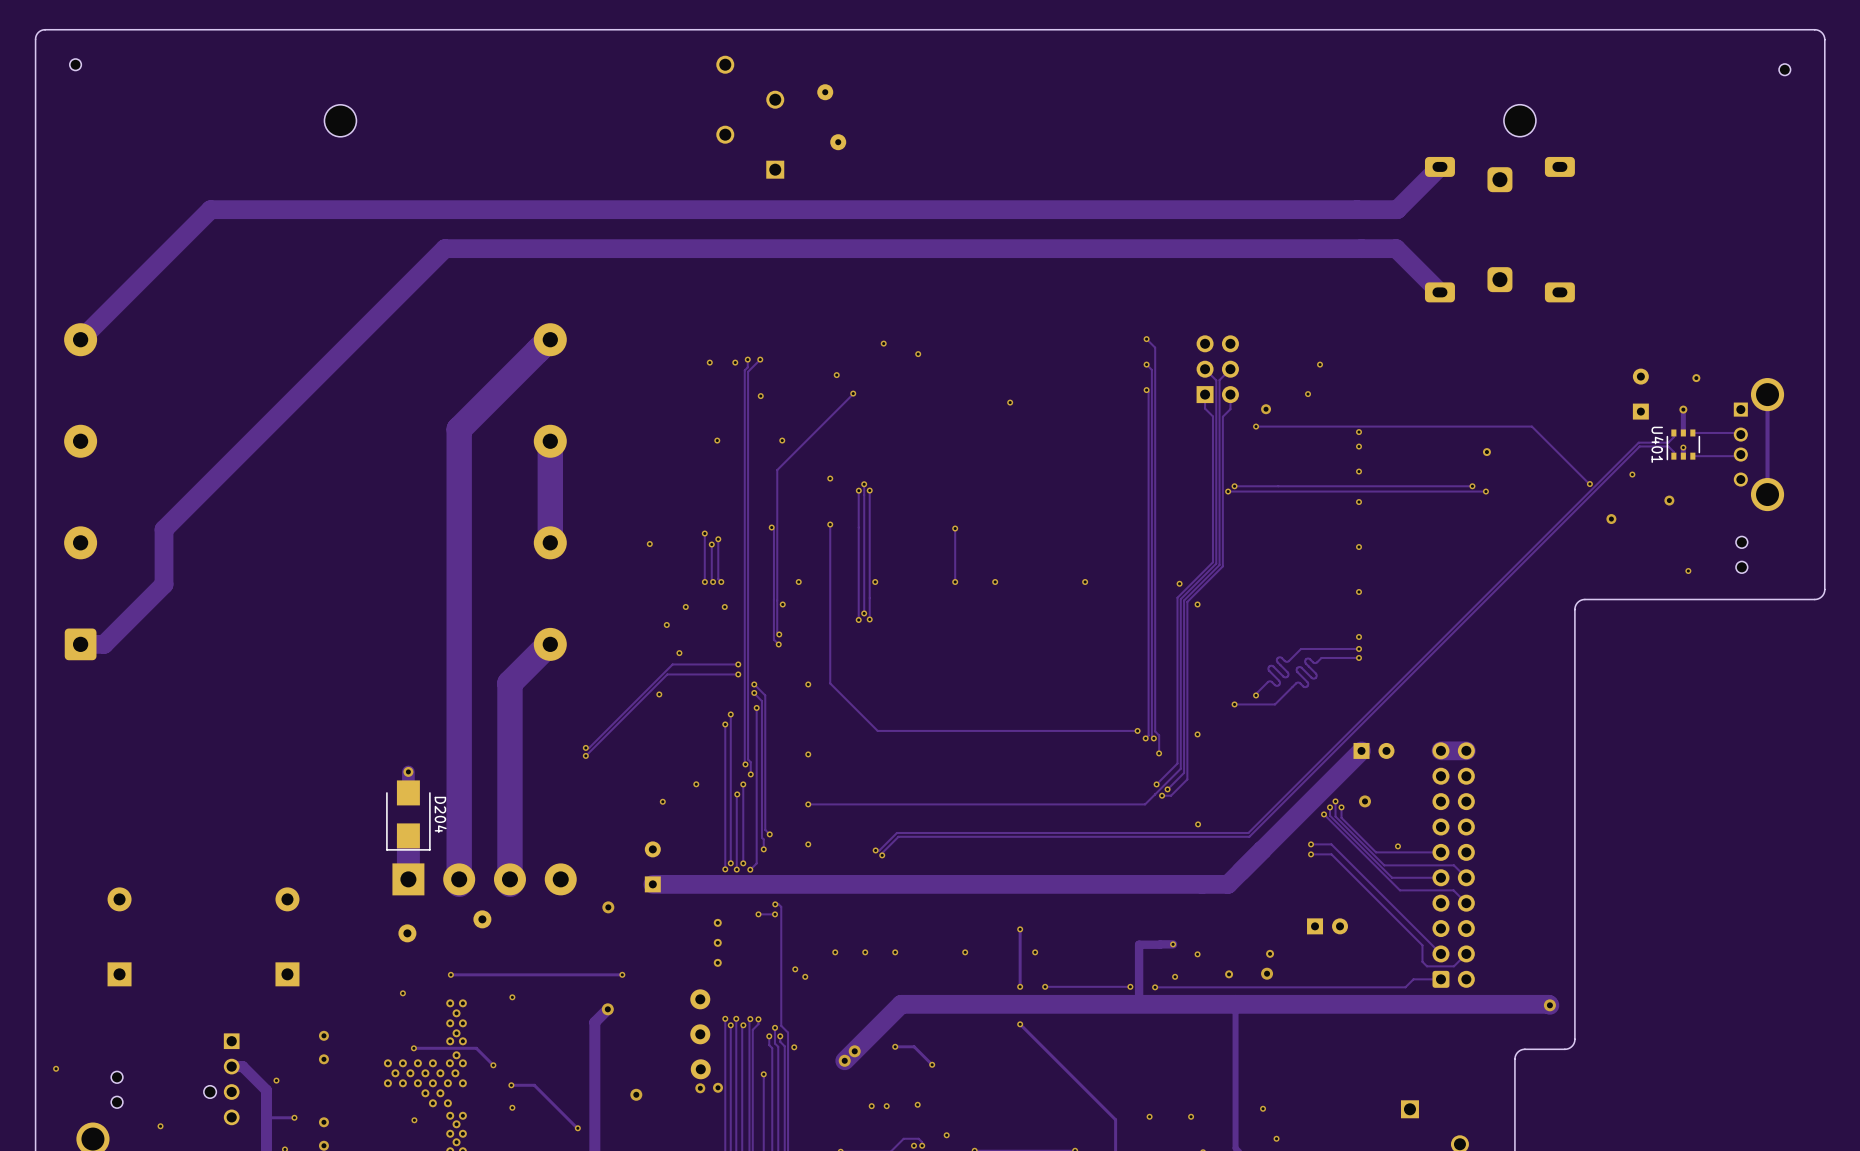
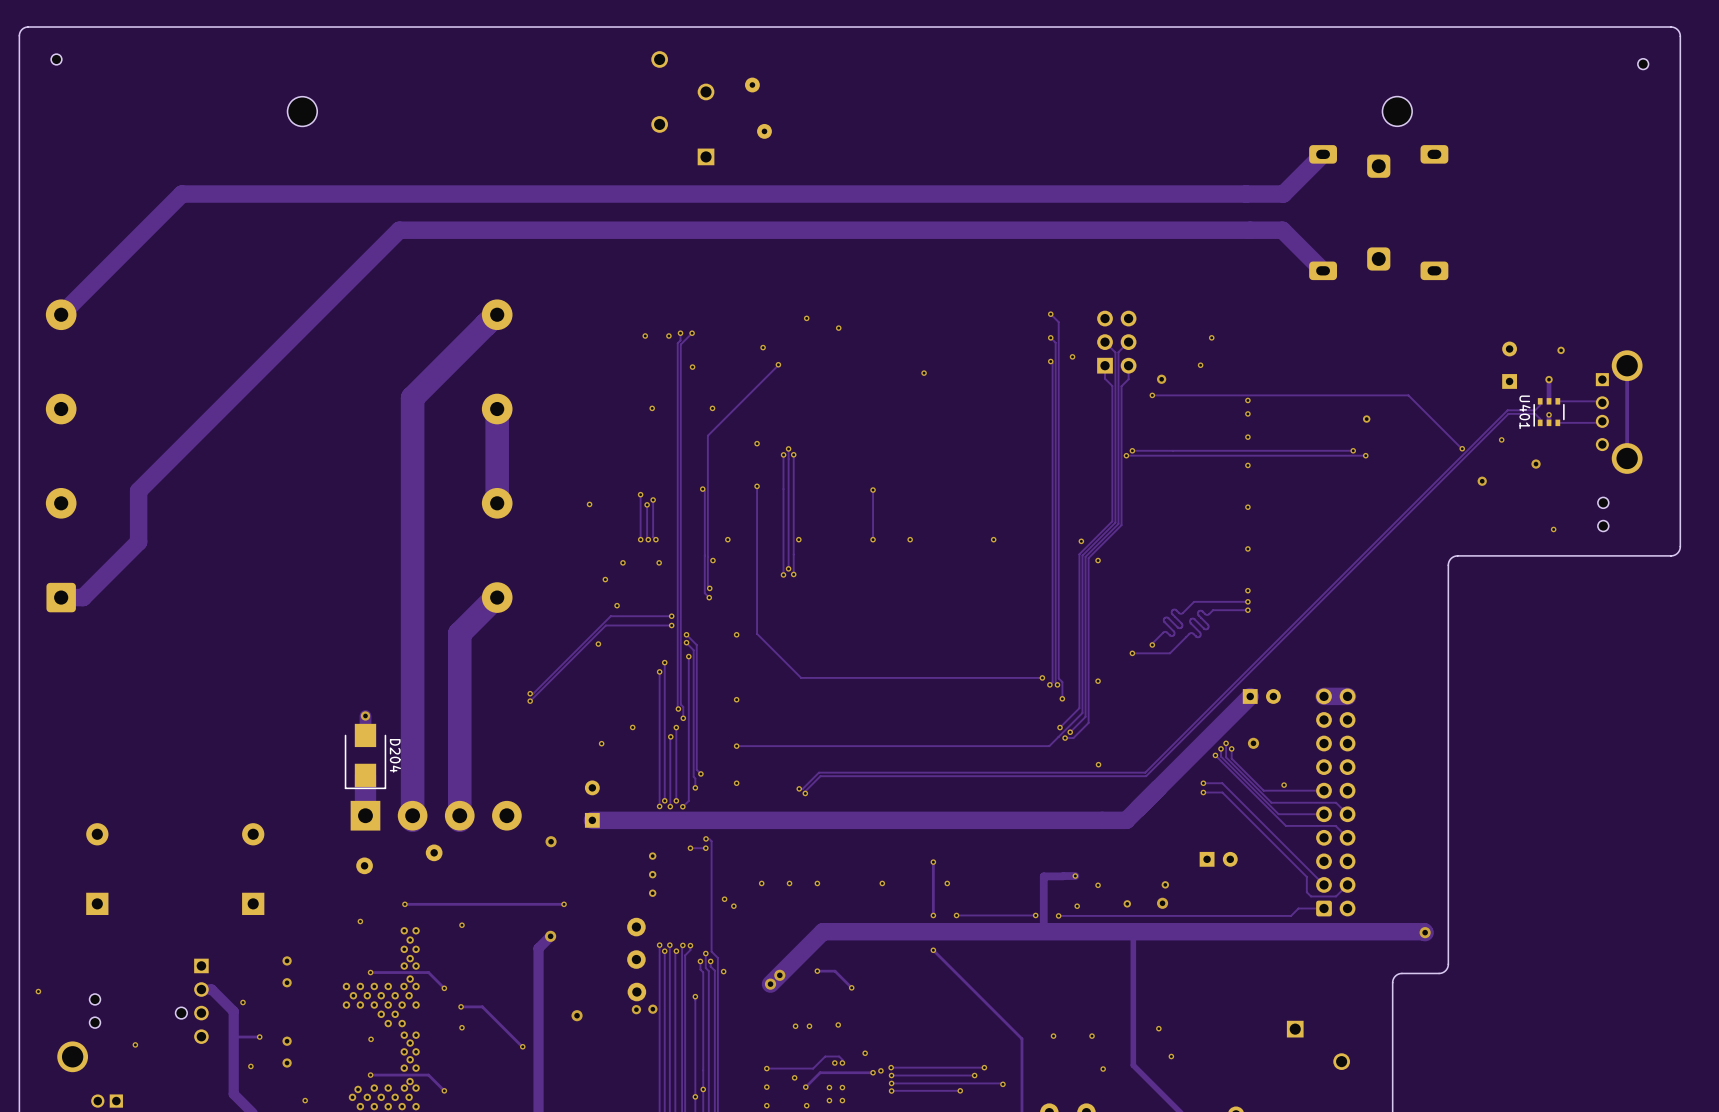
via: none -> (1072, 356)

